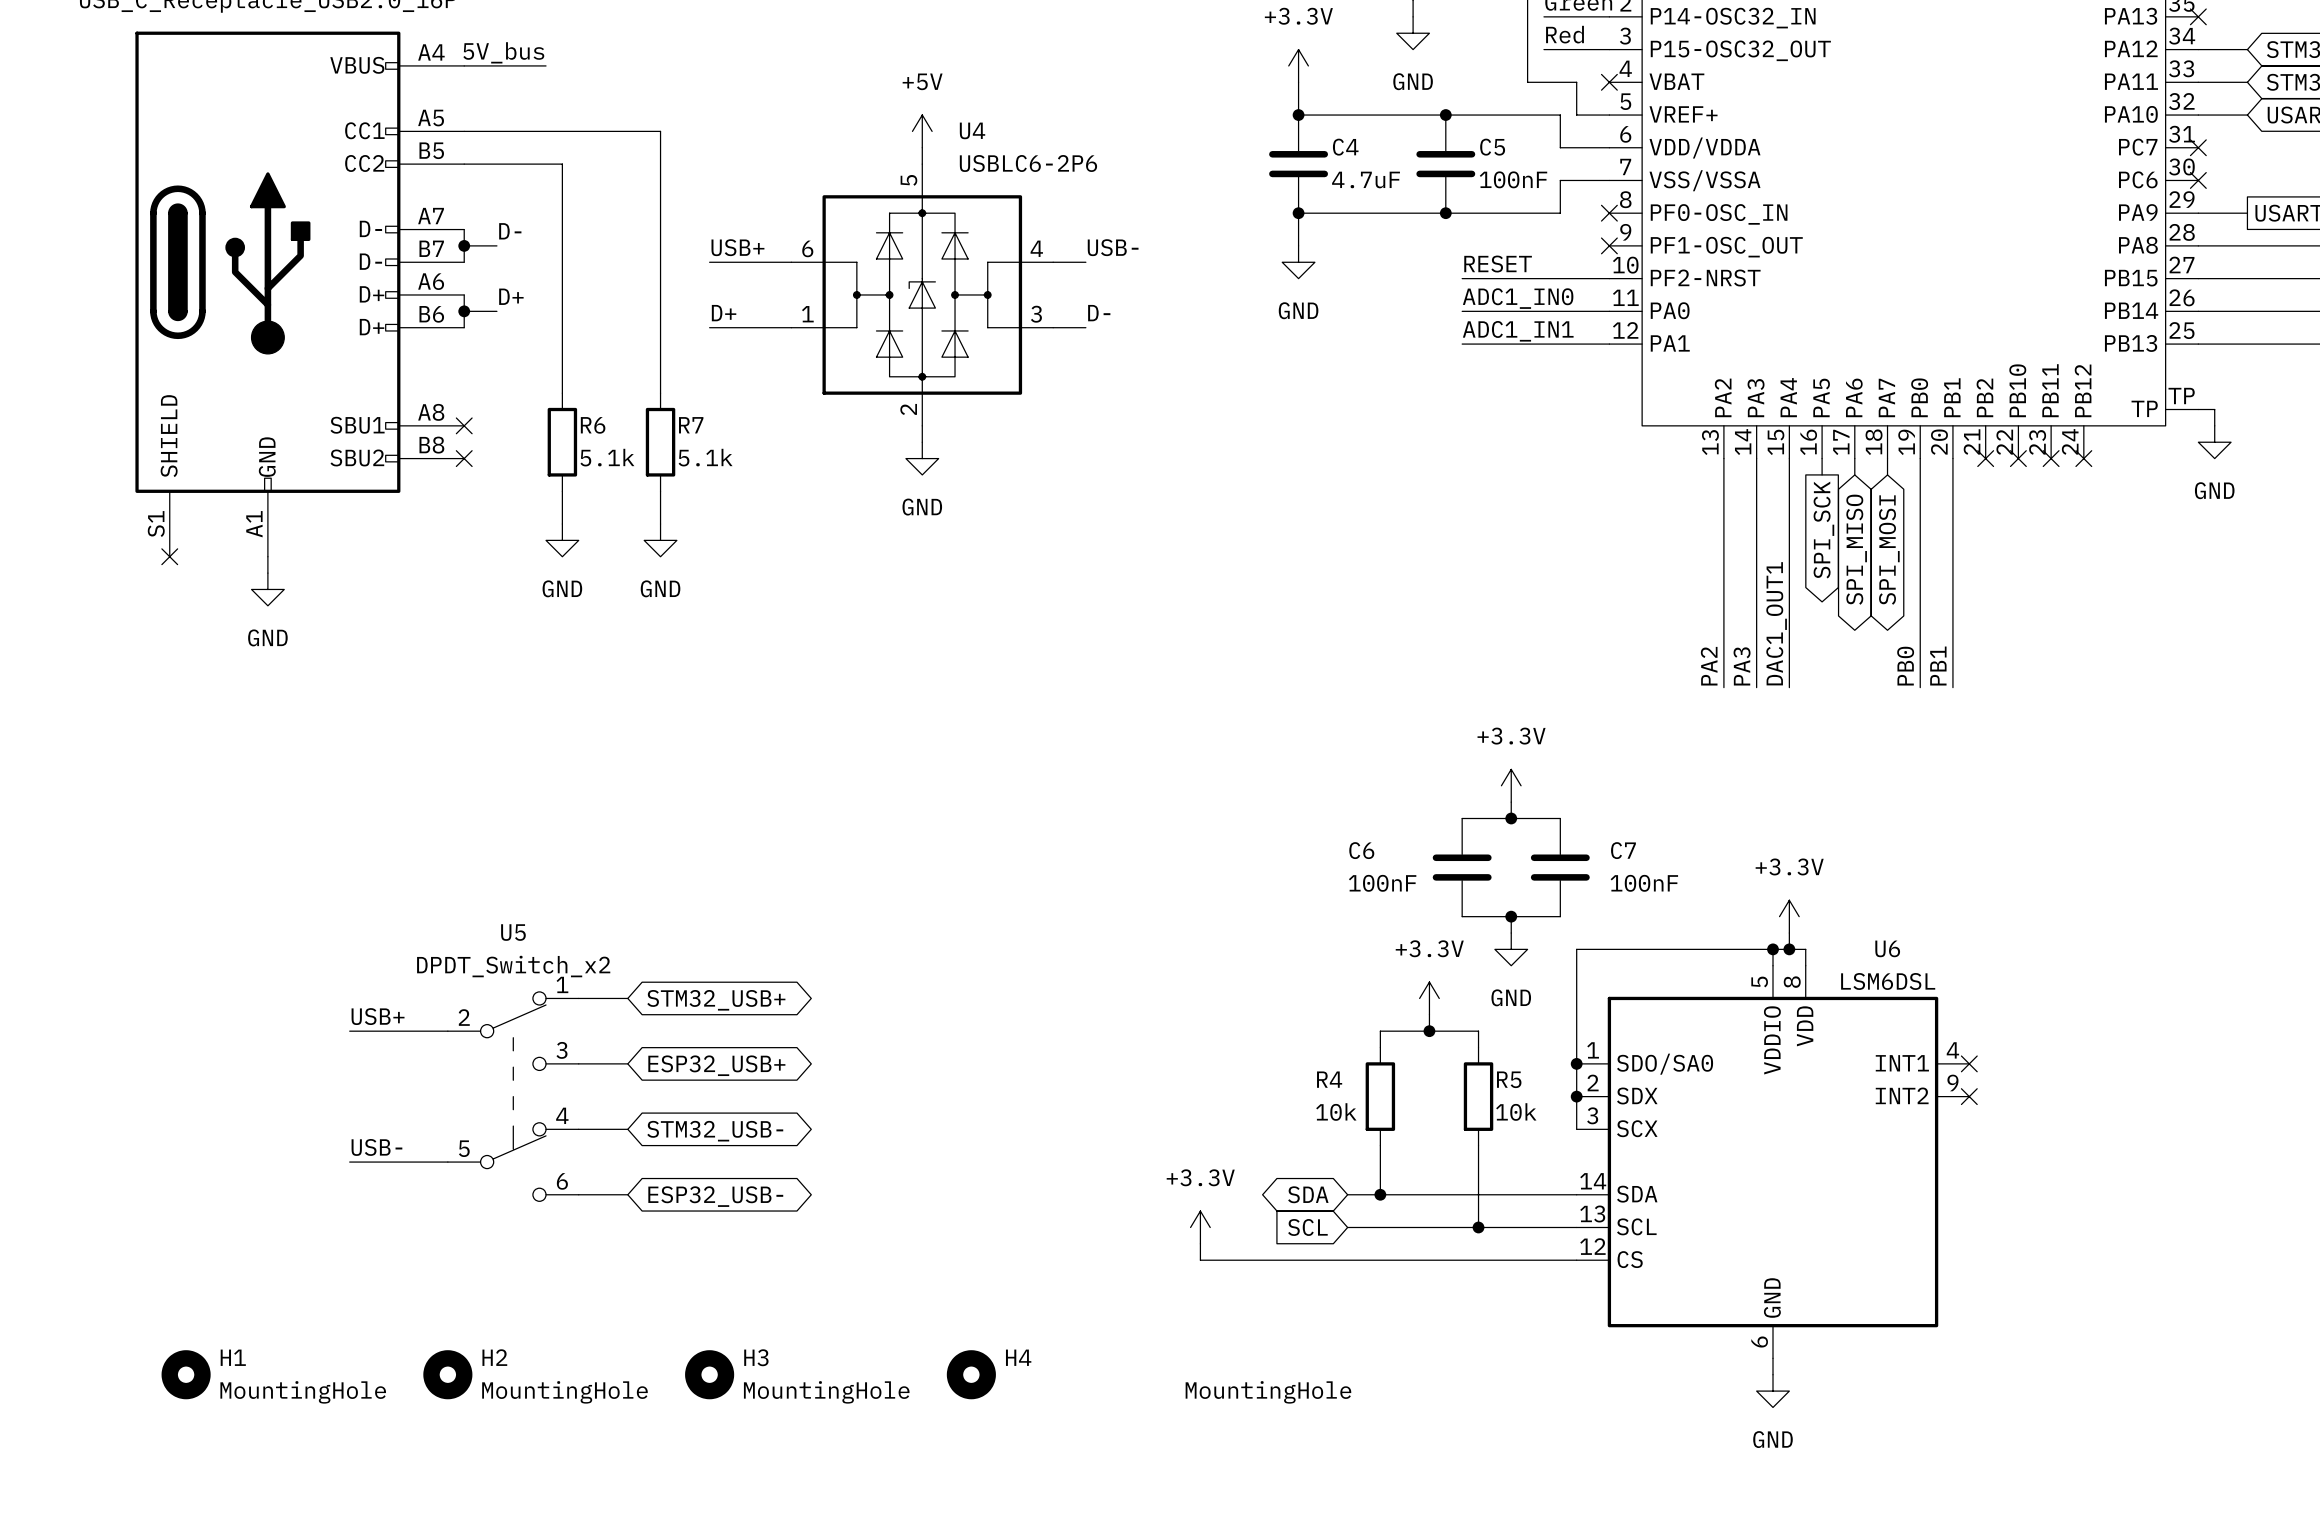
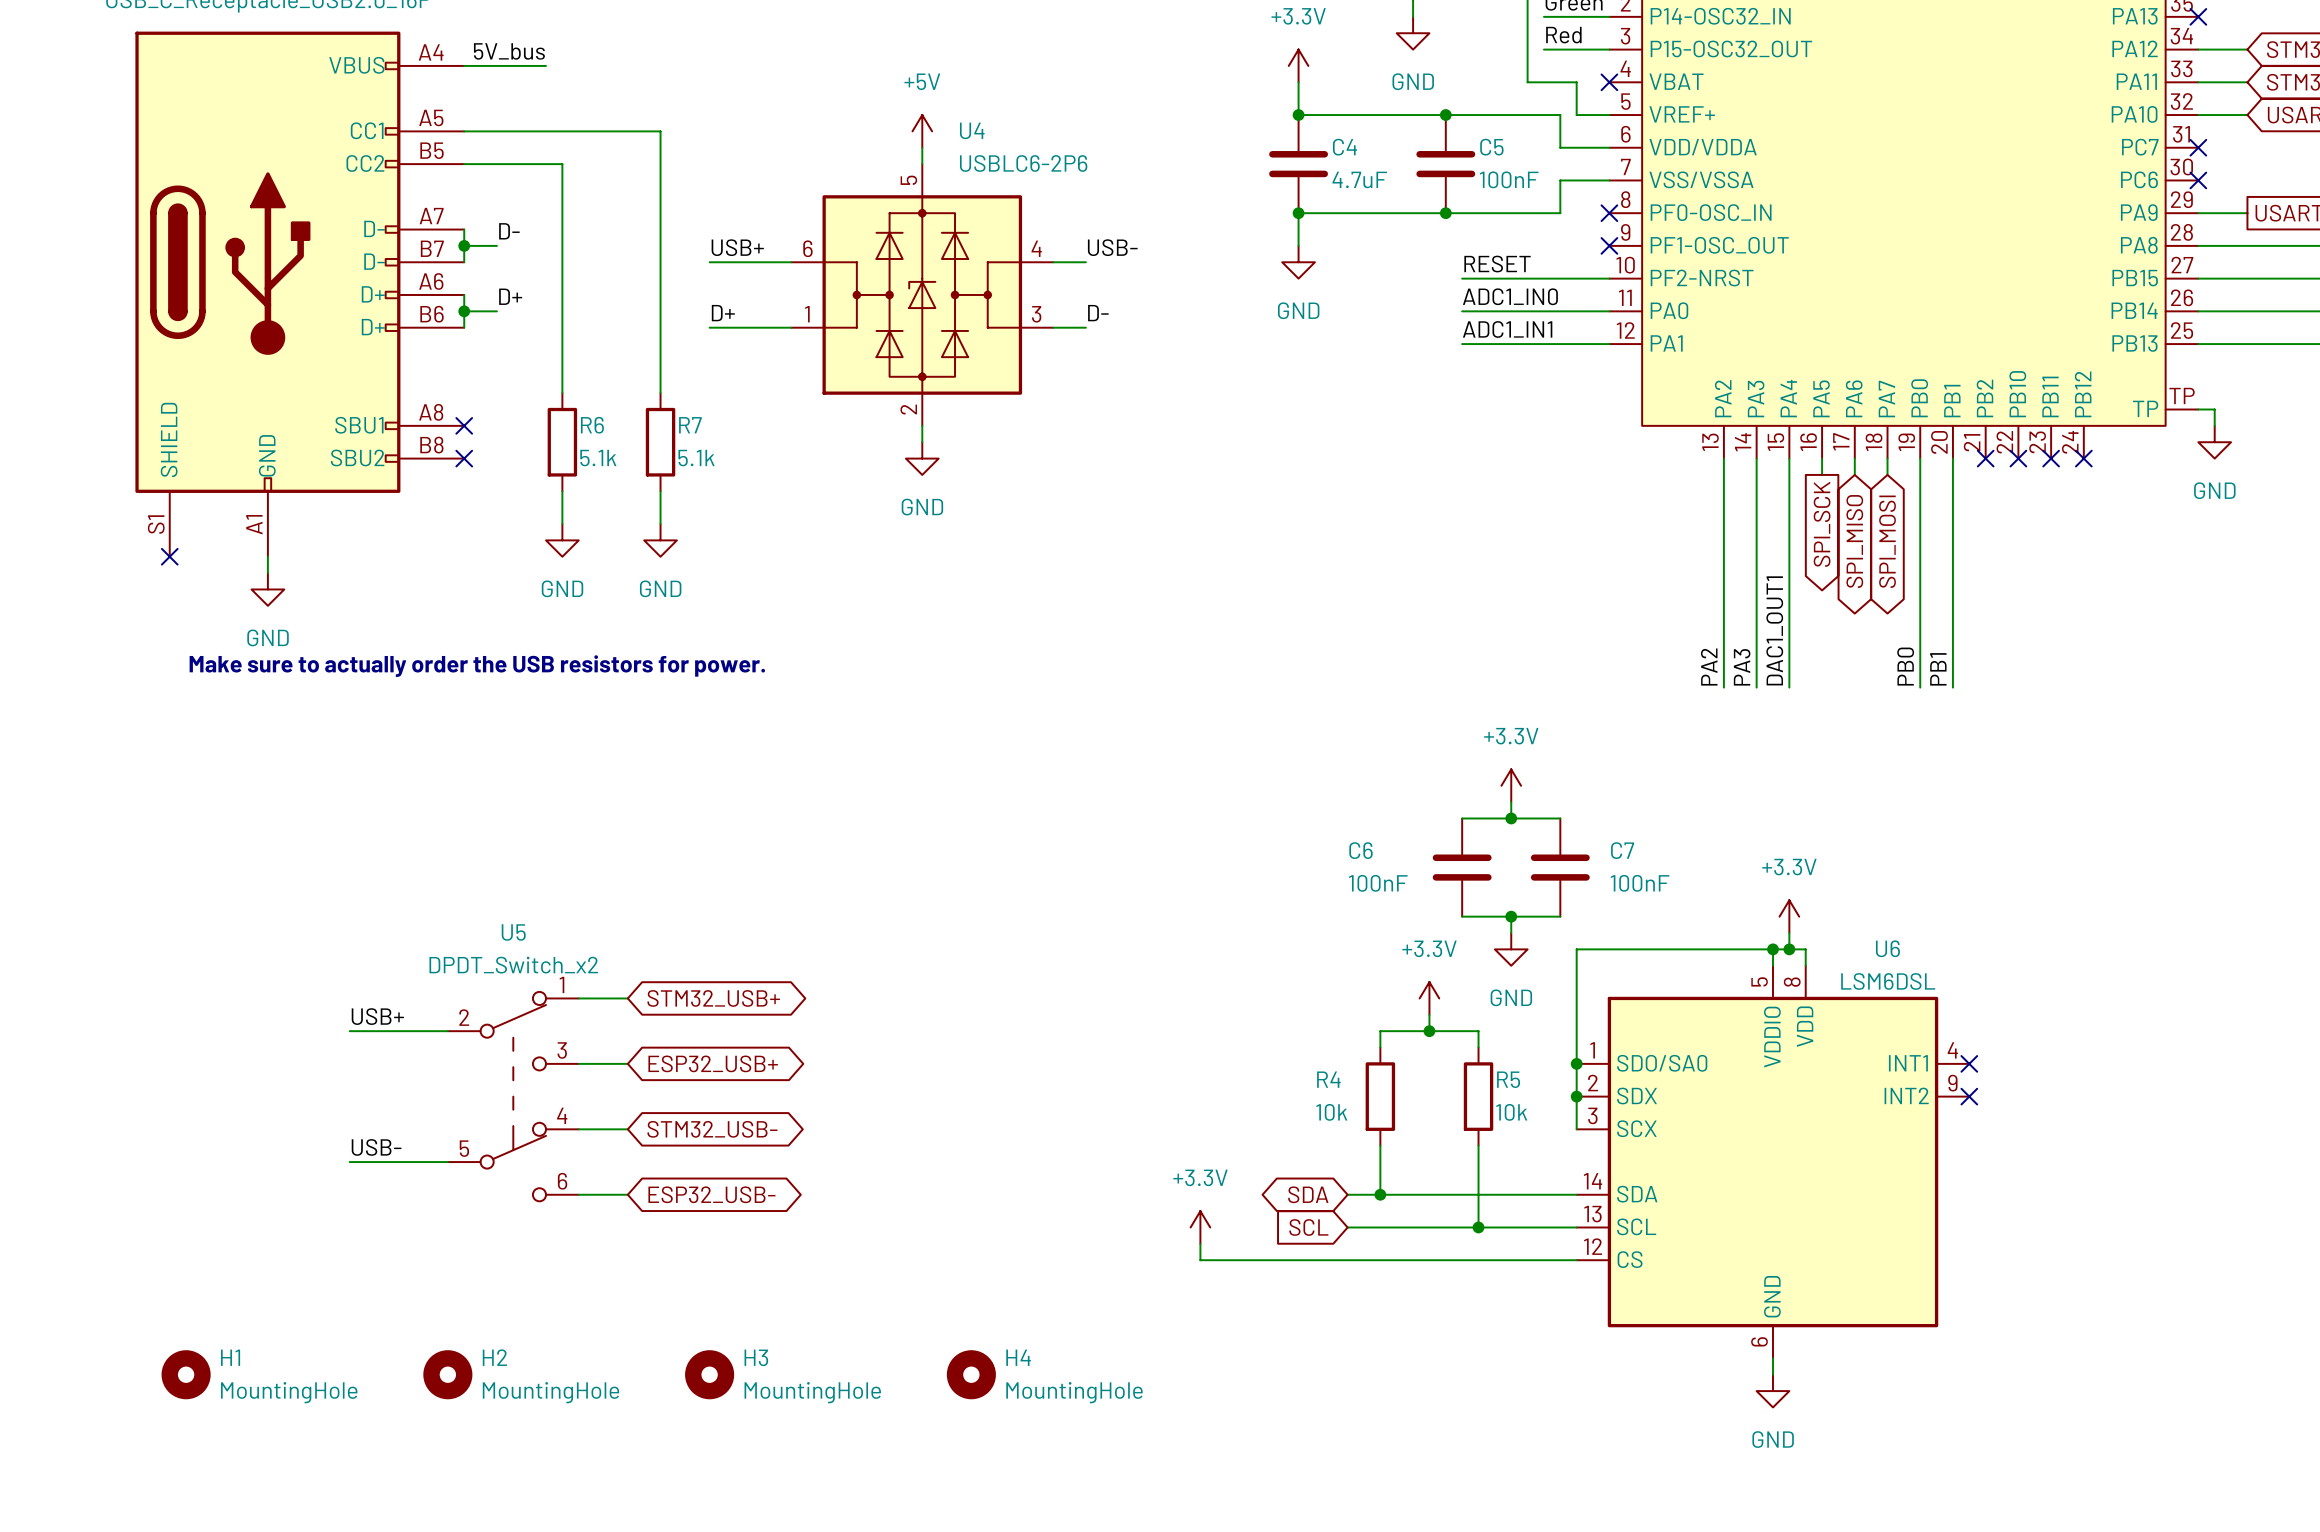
text: none -> Make sure to actually order the USB resistors for power. (477, 666)
H4 value position: MountingHole (1268, 1392) -> MountingHole (1074, 1392)

